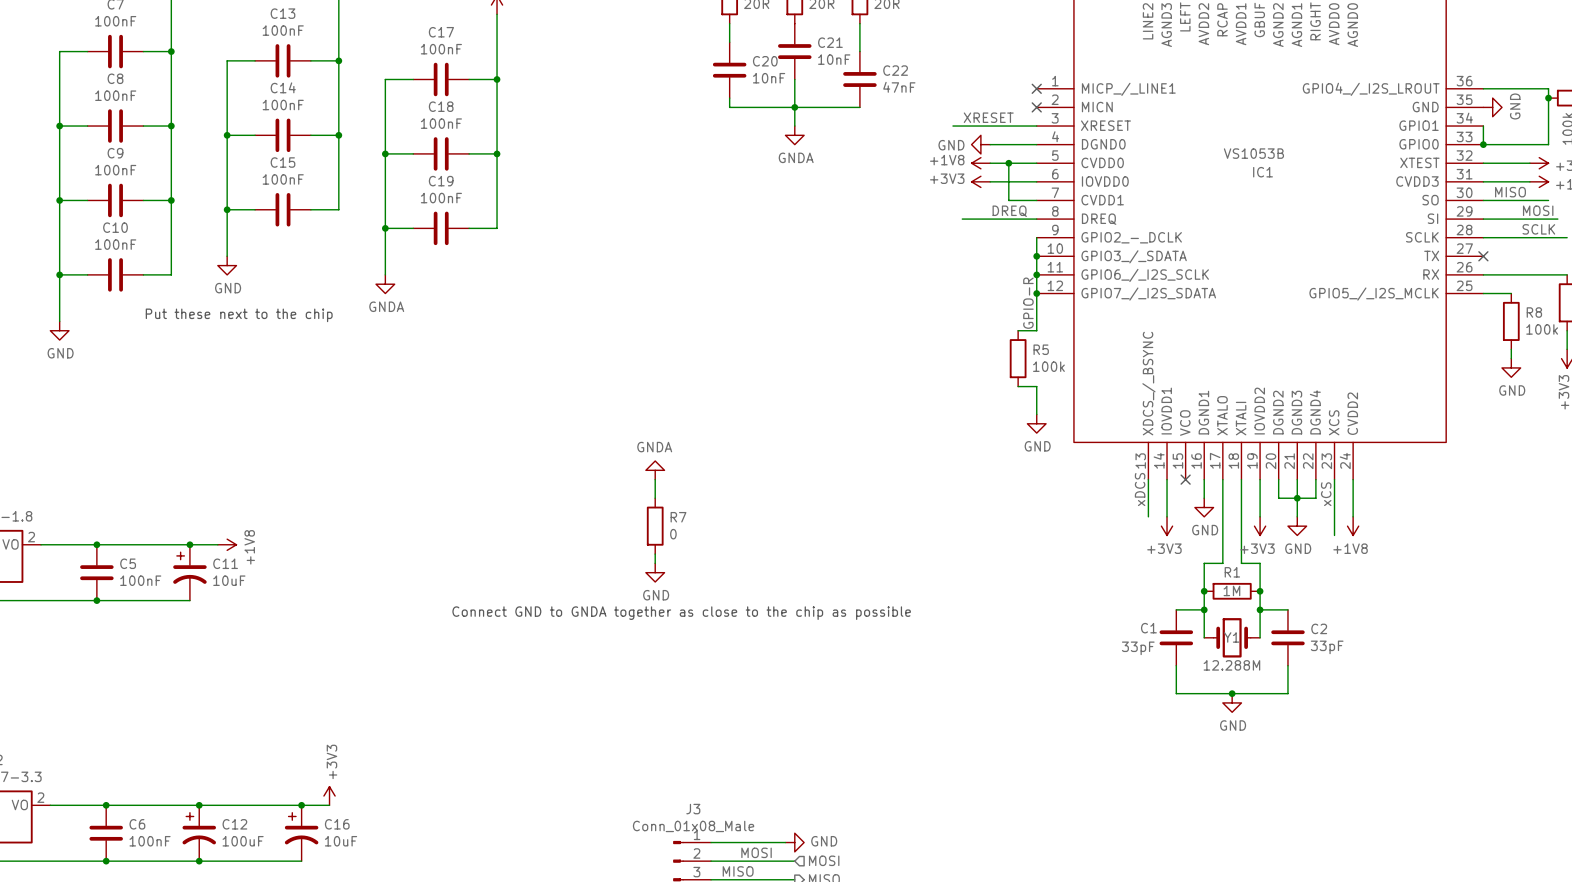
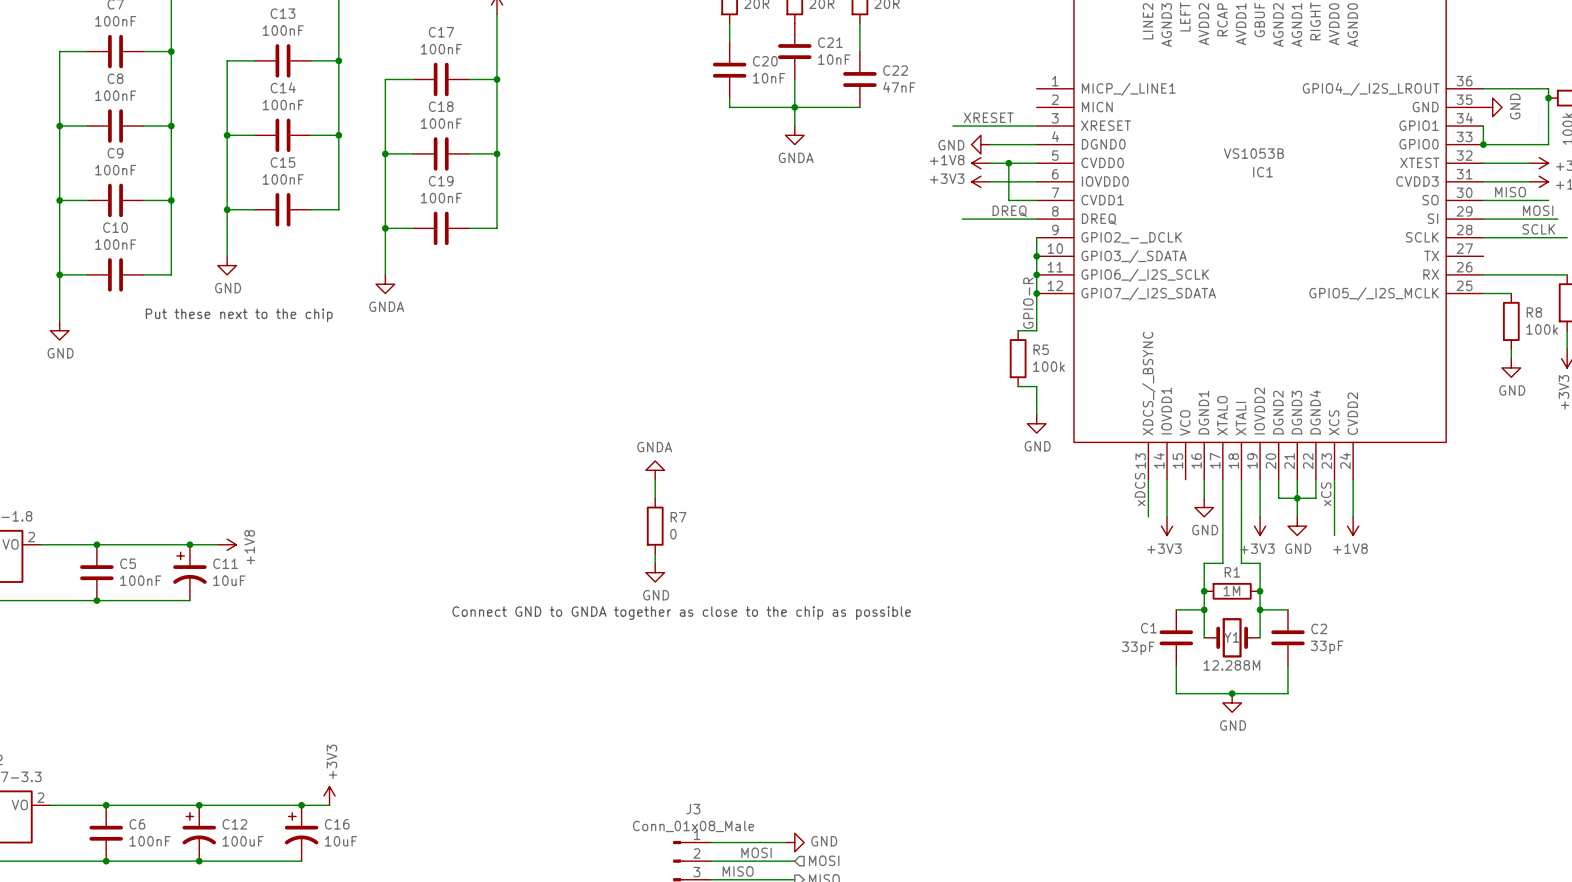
no-connect mark: (1036, 88) -> none
no-connect mark: (1036, 107) -> none
no-connect mark: (1483, 256) -> none
no-connect mark: (1185, 479) -> none

